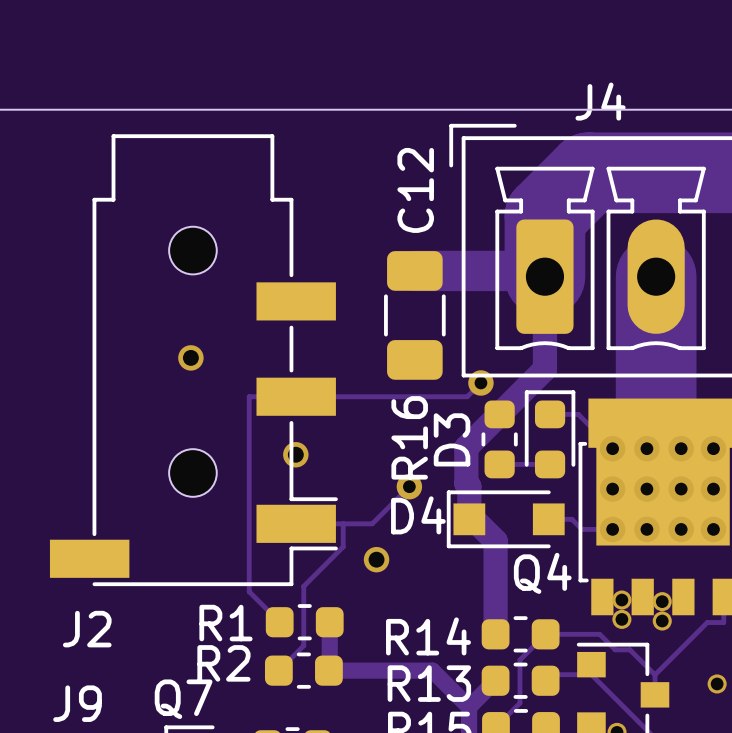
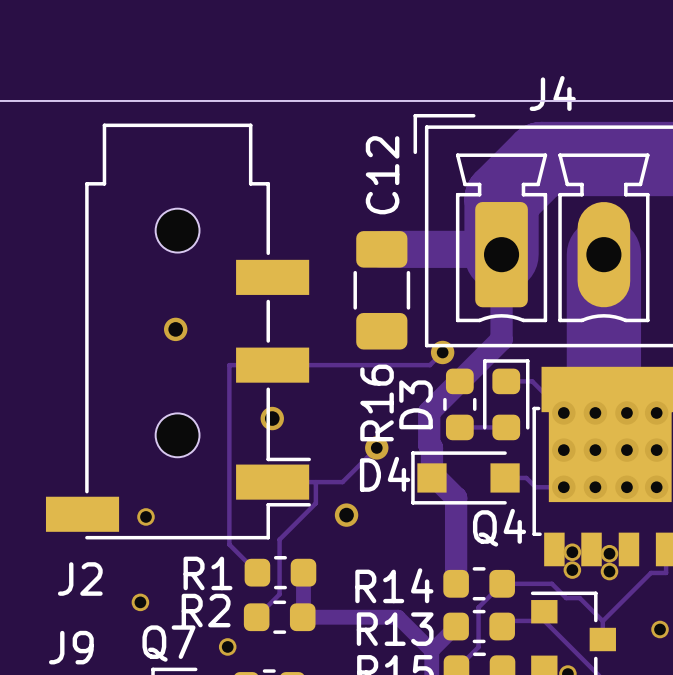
via: none -> (145, 516)
via: none -> (140, 602)
via: none -> (227, 646)

